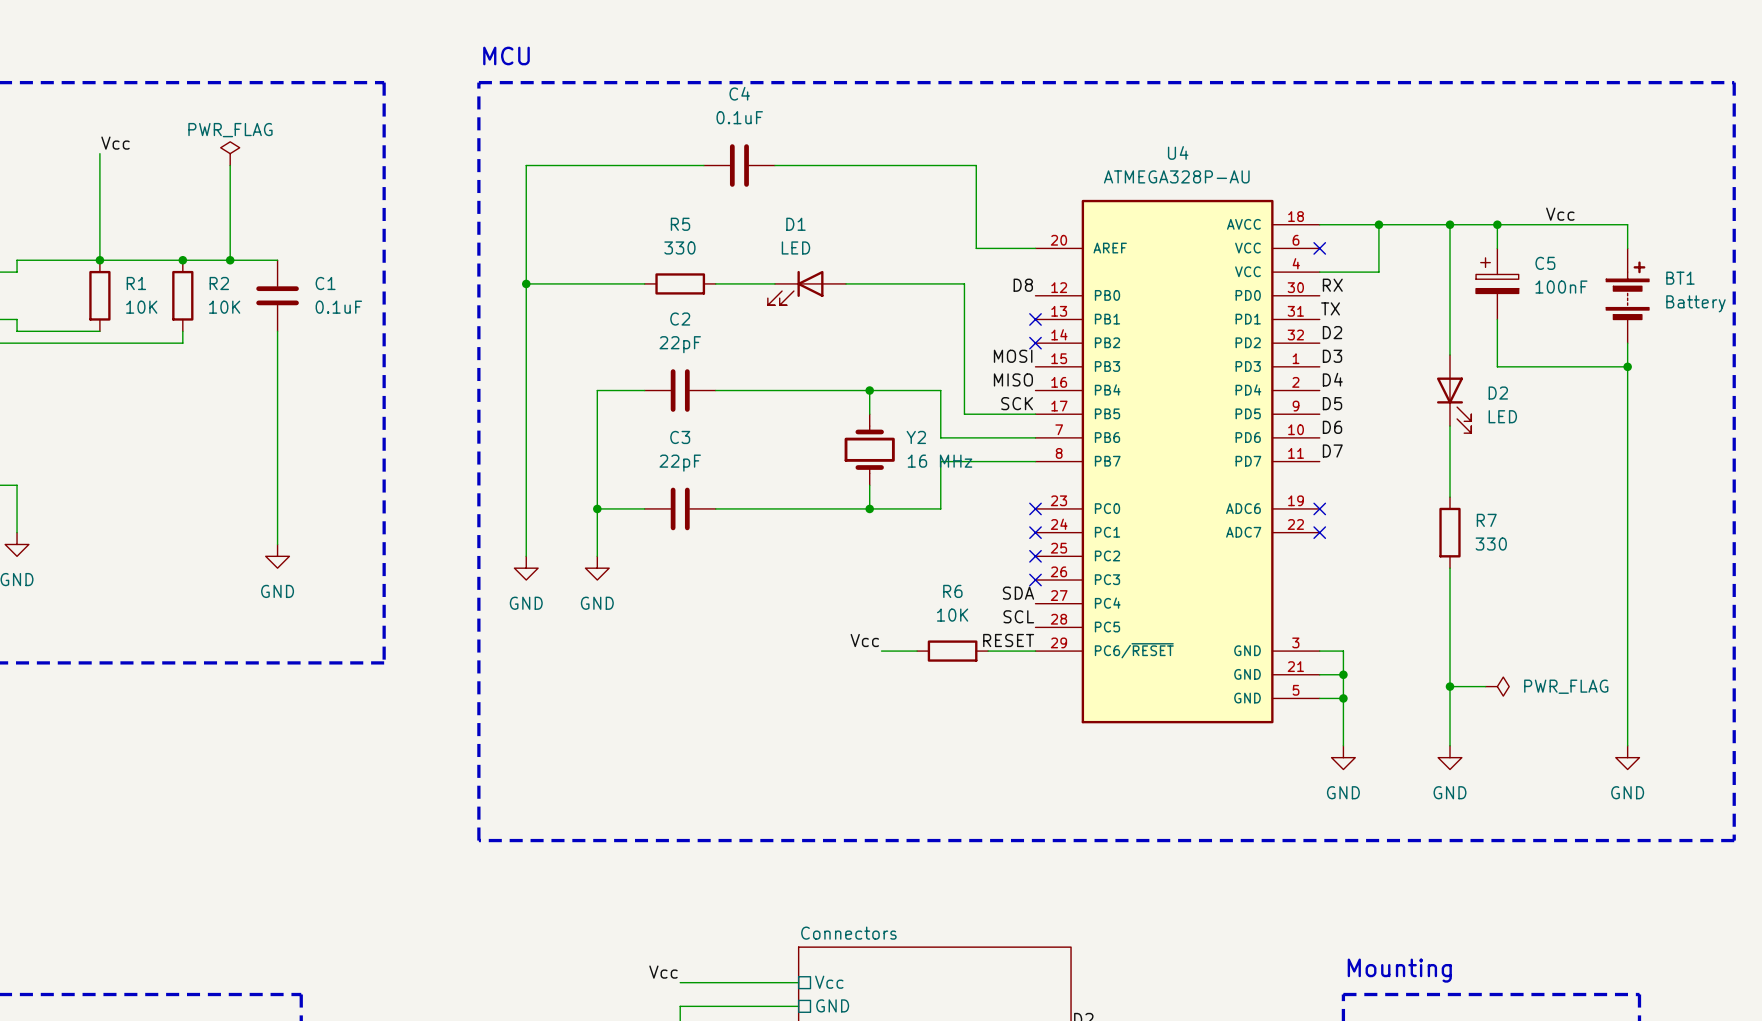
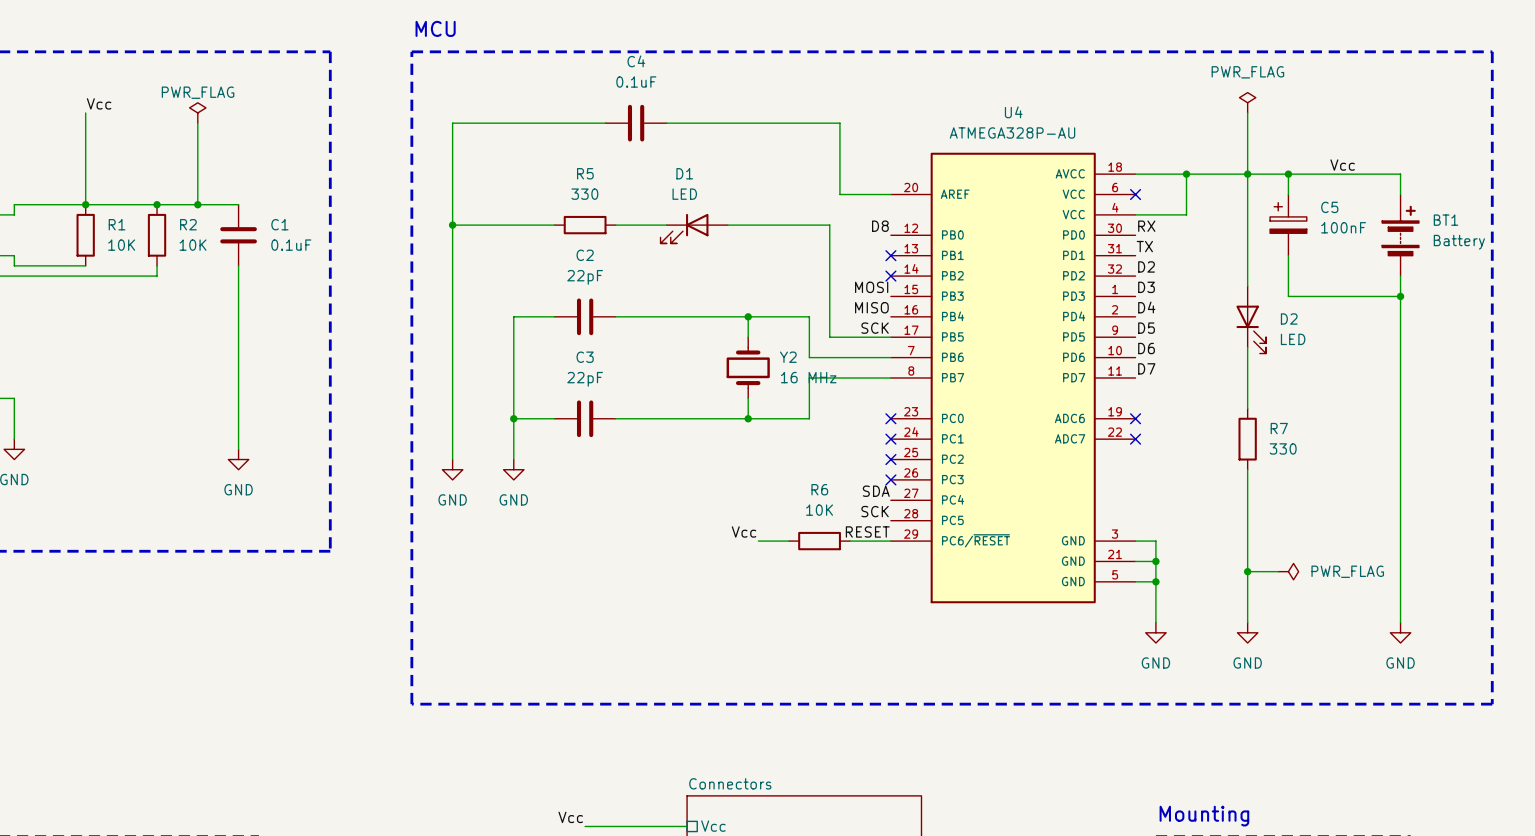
power symbol: none -> PWR_FLAG (1247, 102)
wire: none -> (1247, 112) (1247, 174)
label: SCL (1018, 616) -> SCK (875, 511)

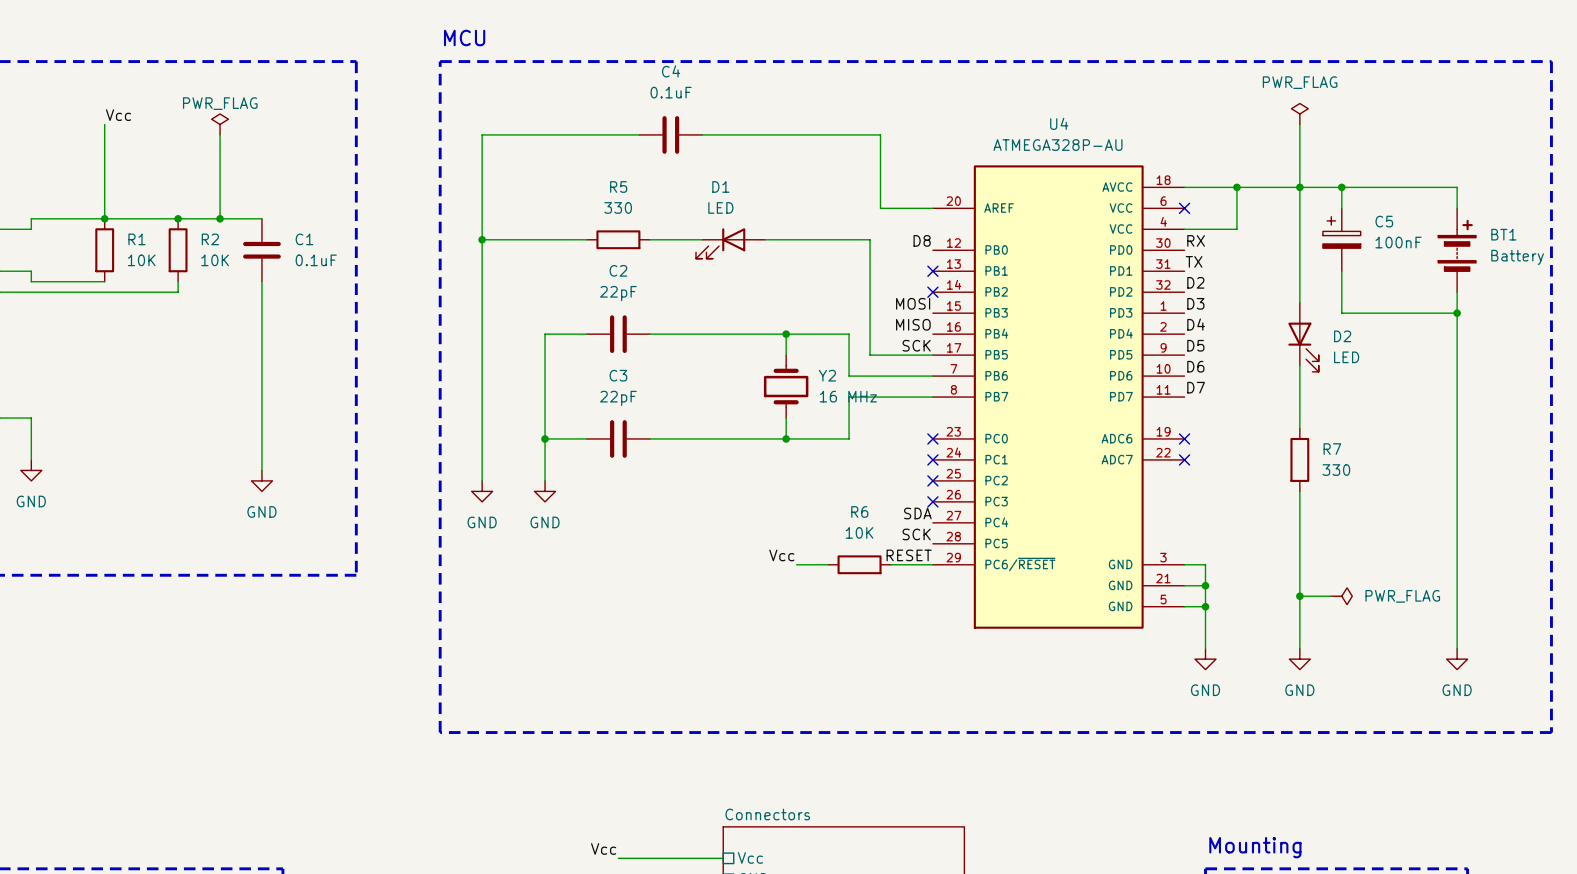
label: Vcc (1342, 165) -> none

